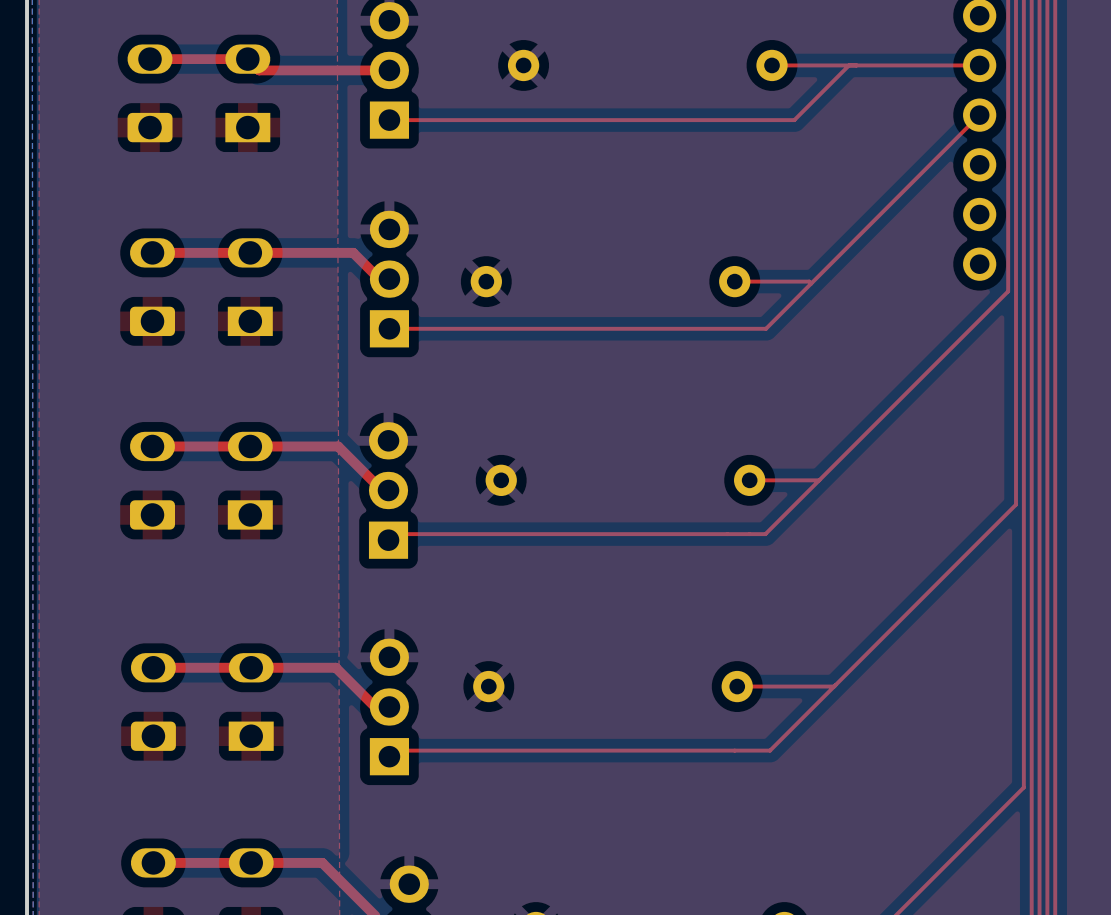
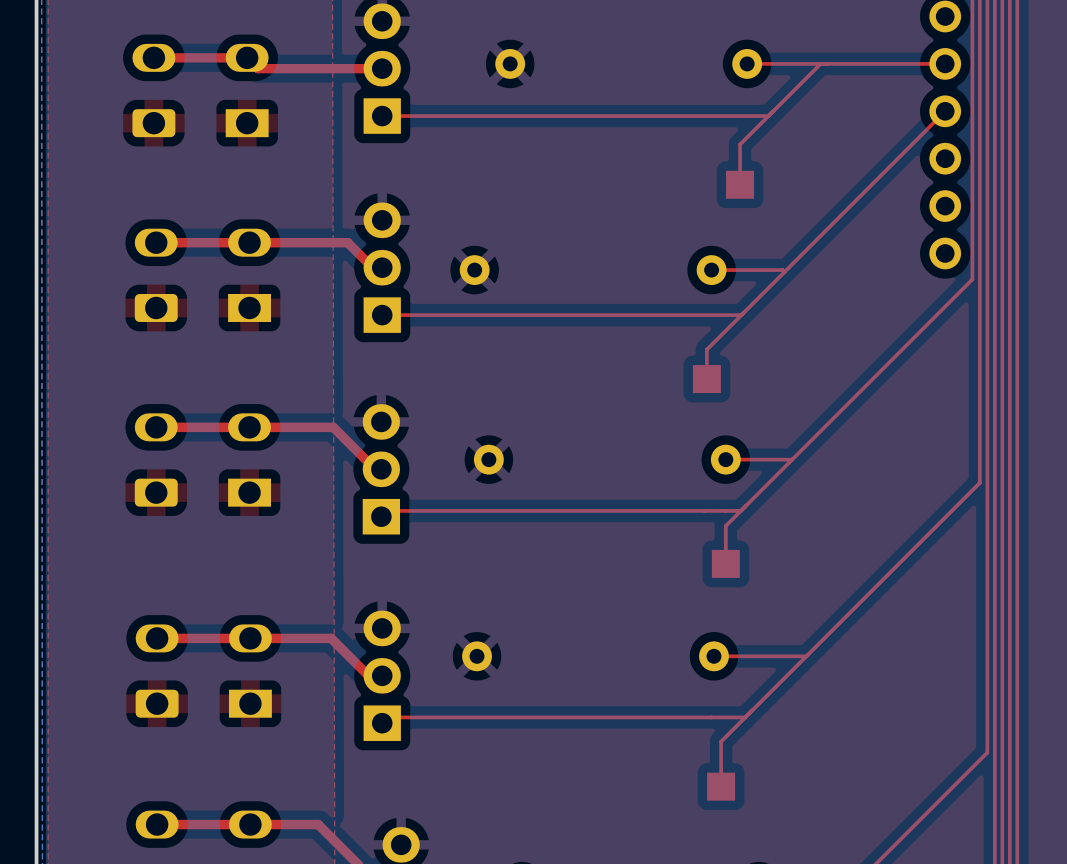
top track: none -> (768, 116) (740, 144) (740, 184)
part: none -> (740, 184)
top track: none -> (741, 315) (706, 349) (706, 379)
part: none -> (706, 379)
top track: none -> (740, 510) (725, 525) (725, 563)
part: none -> (725, 563)
top track: none -> (745, 717) (721, 741) (721, 786)
part: none -> (721, 786)

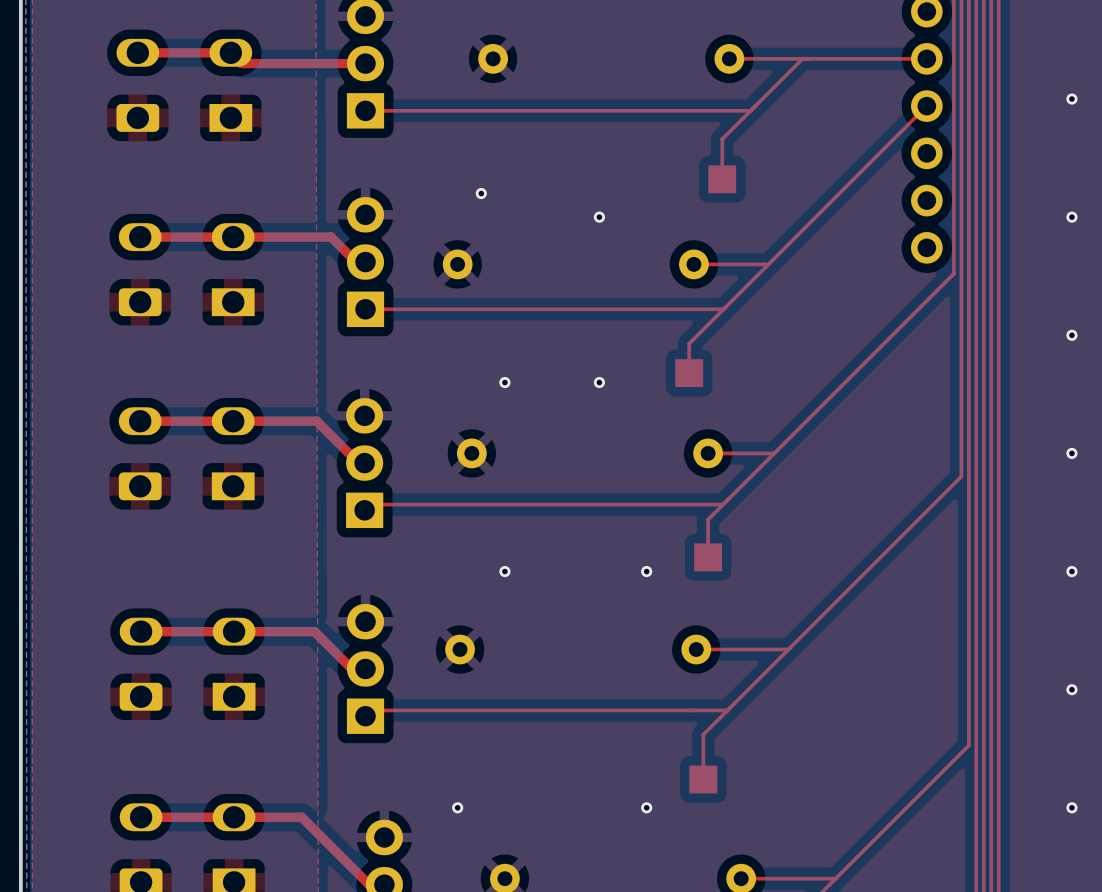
via: none -> (481, 193)
via: none -> (599, 217)
via: none -> (504, 382)
via: none -> (599, 382)
via: none -> (504, 571)
via: none -> (646, 571)
via: none -> (457, 807)
via: none -> (646, 807)

